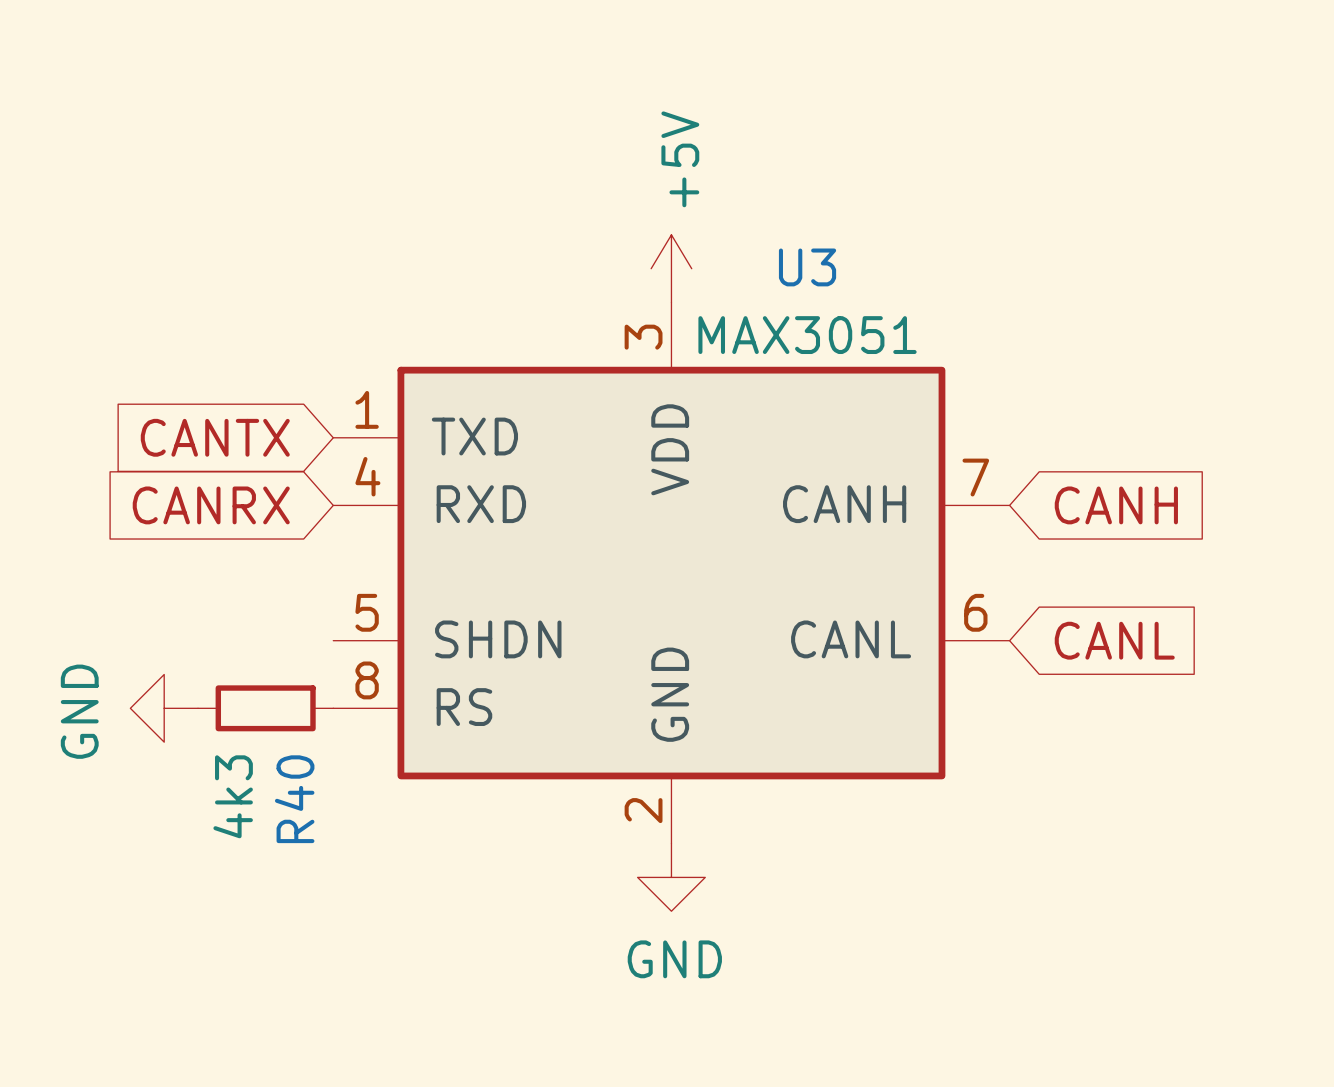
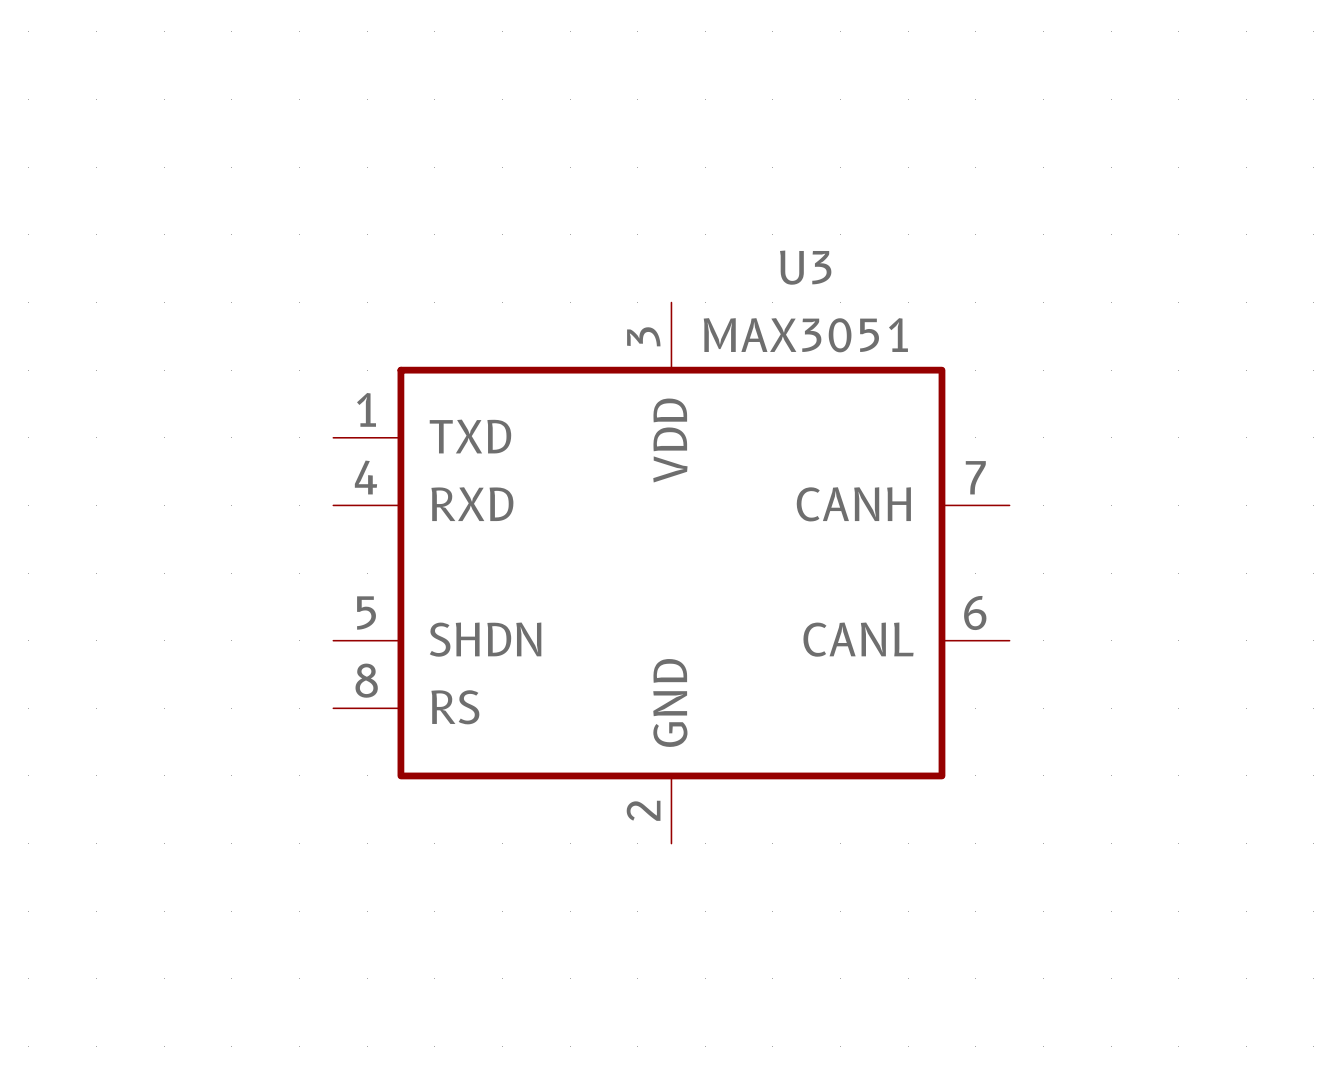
power symbol: +5V (671, 268) -> none
global label: CANTX (215, 437) -> none
global label: CANRX (211, 505) -> none
global label: CANH (1116, 505) -> none
global label: CANL (1114, 640) -> none
power symbol: GND (164, 708) -> none
R40: 4k3 (265, 708) -> none
power symbol: GND (671, 877) -> none

